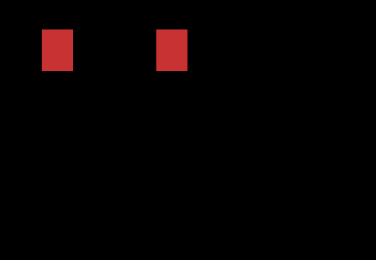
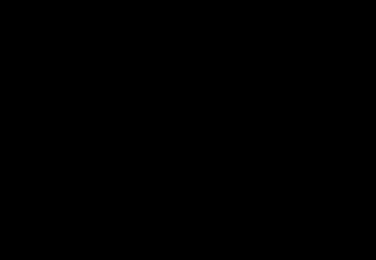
part: (114, 50) -> none

